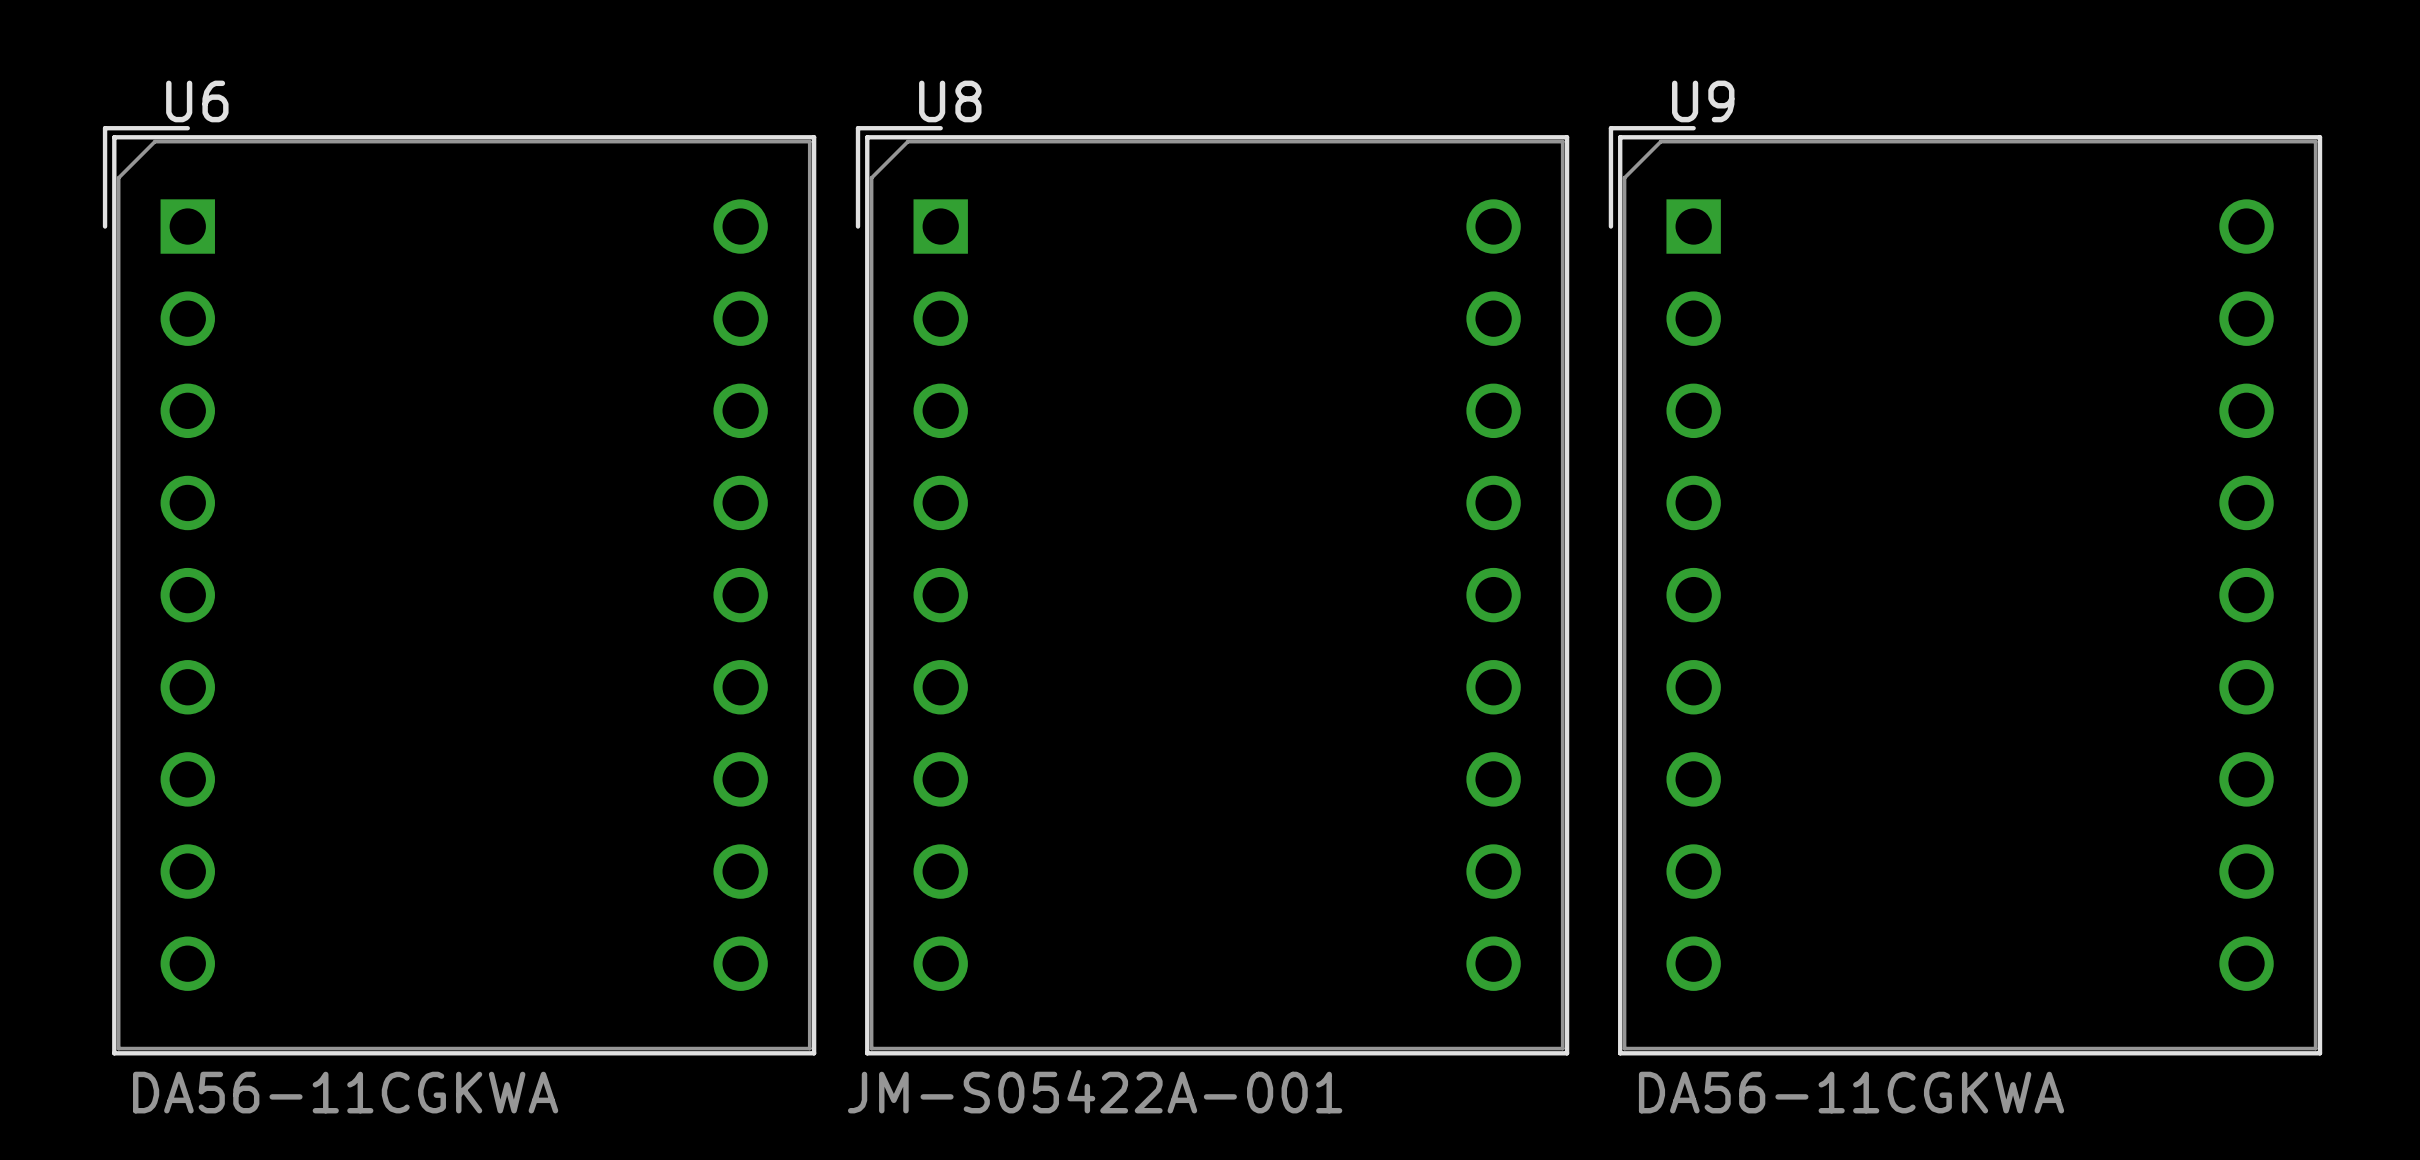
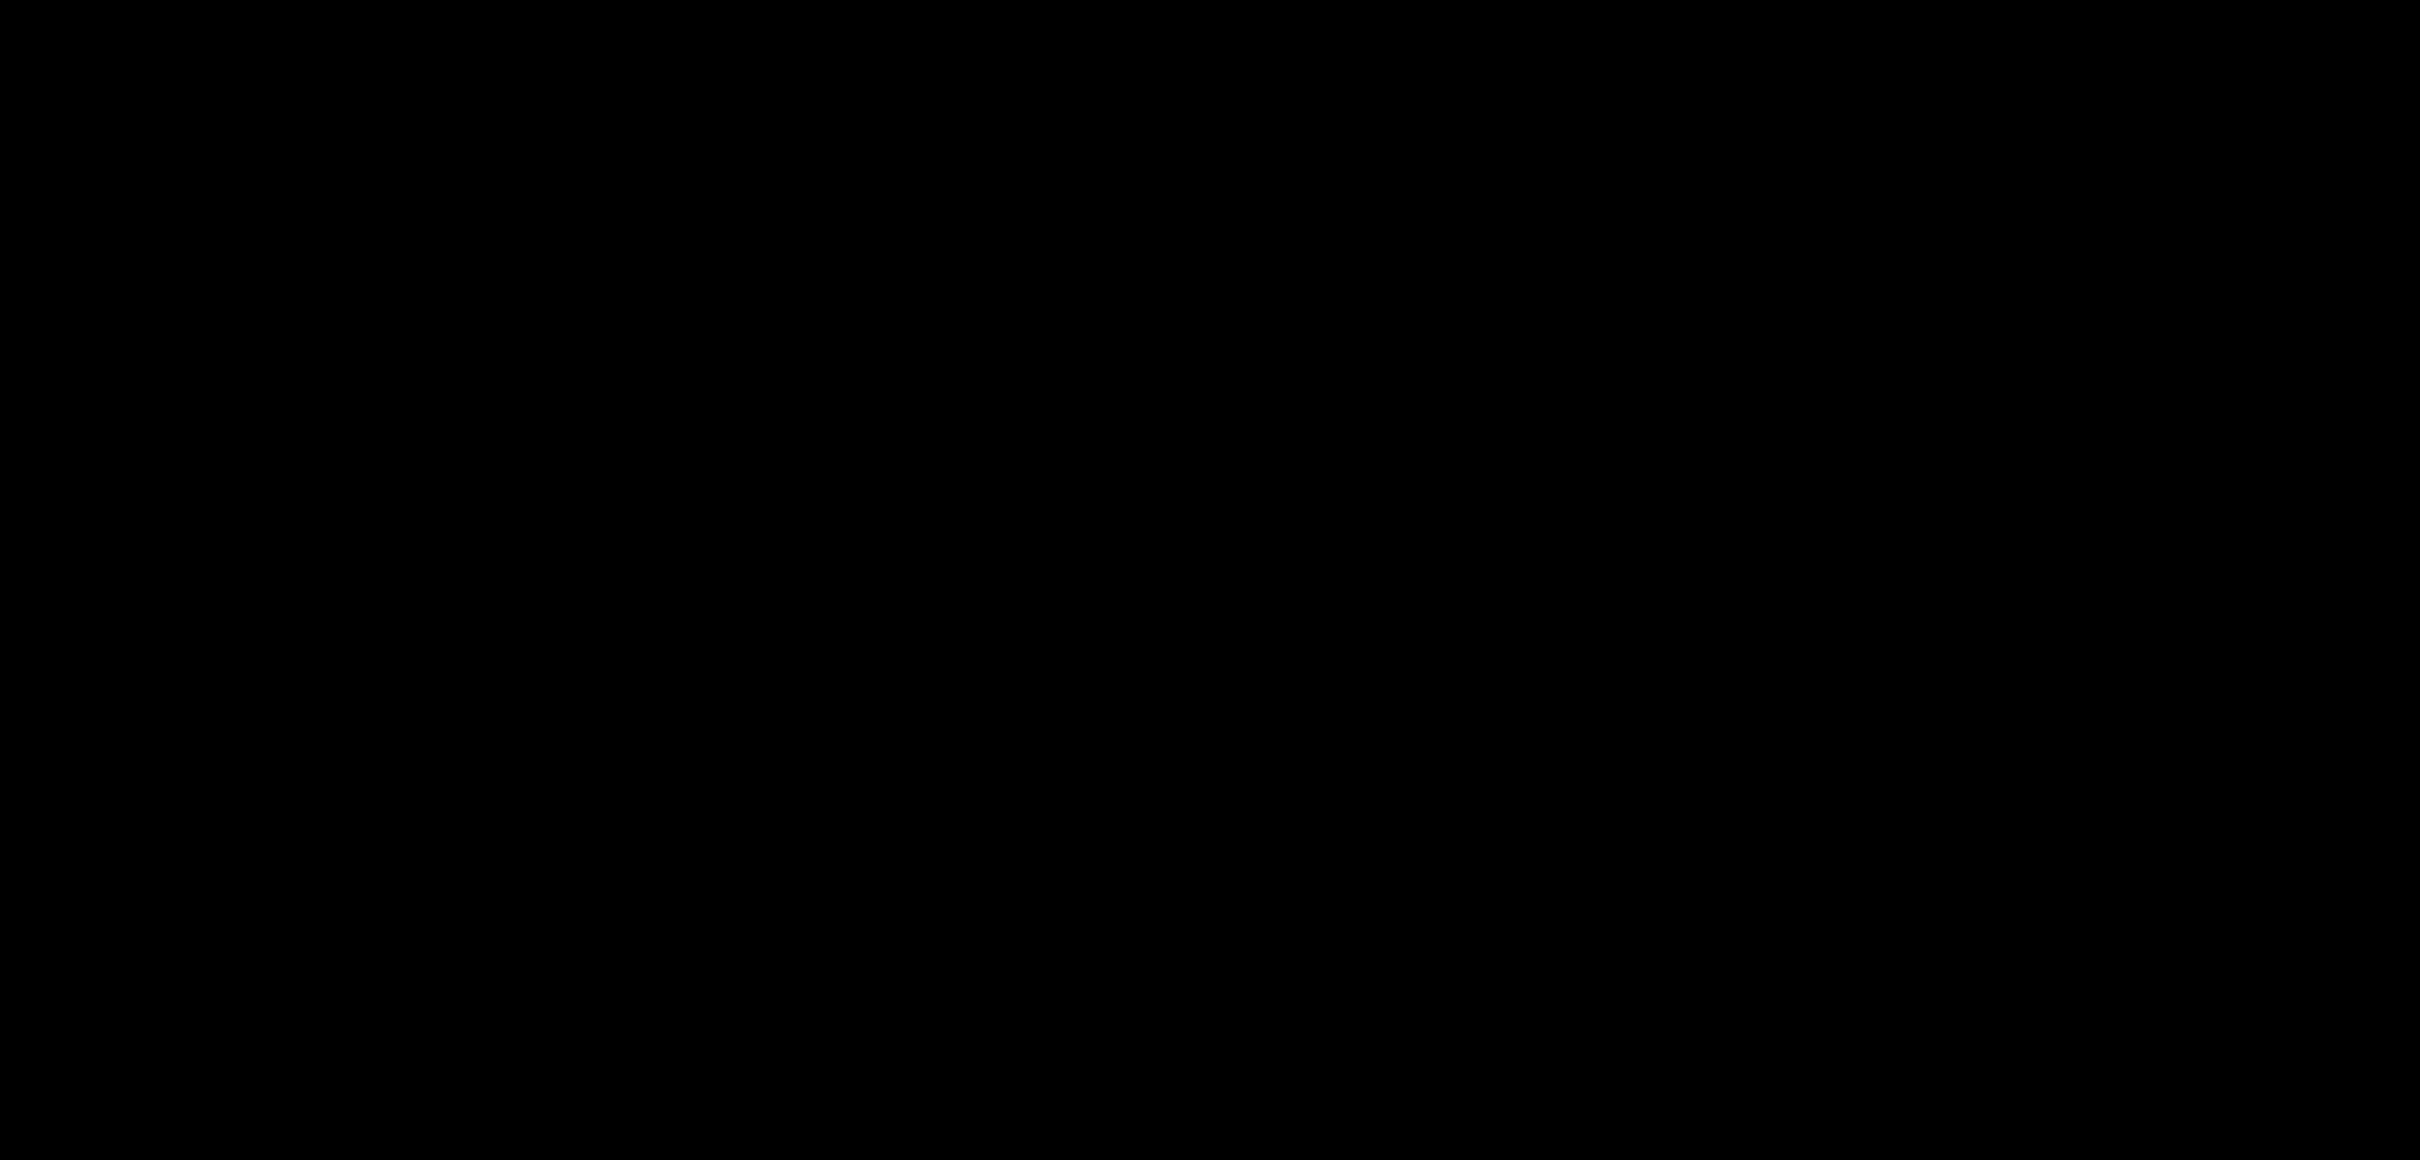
U6: DA56-11CGKWA (459, 590) -> none
U8: JM-S05422A-001 (1212, 590) -> none
U9: DA56-11CGKWA (1965, 590) -> none

